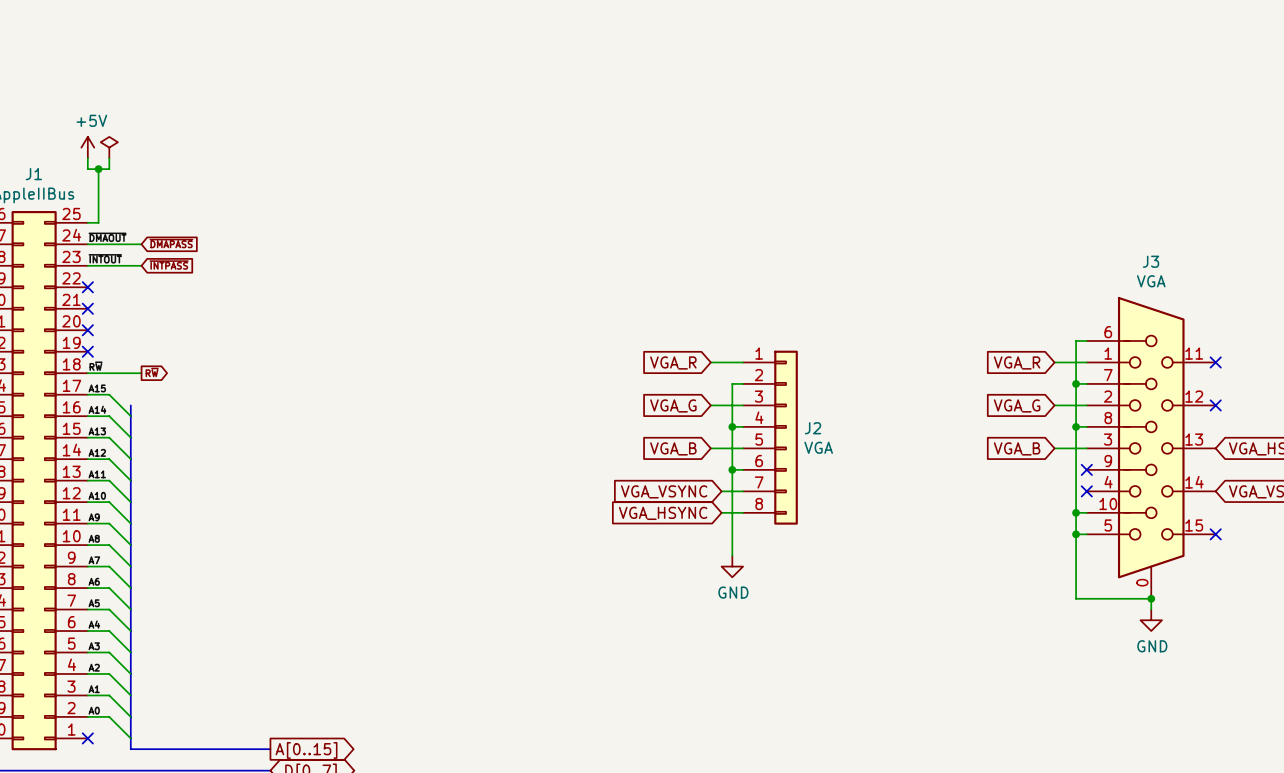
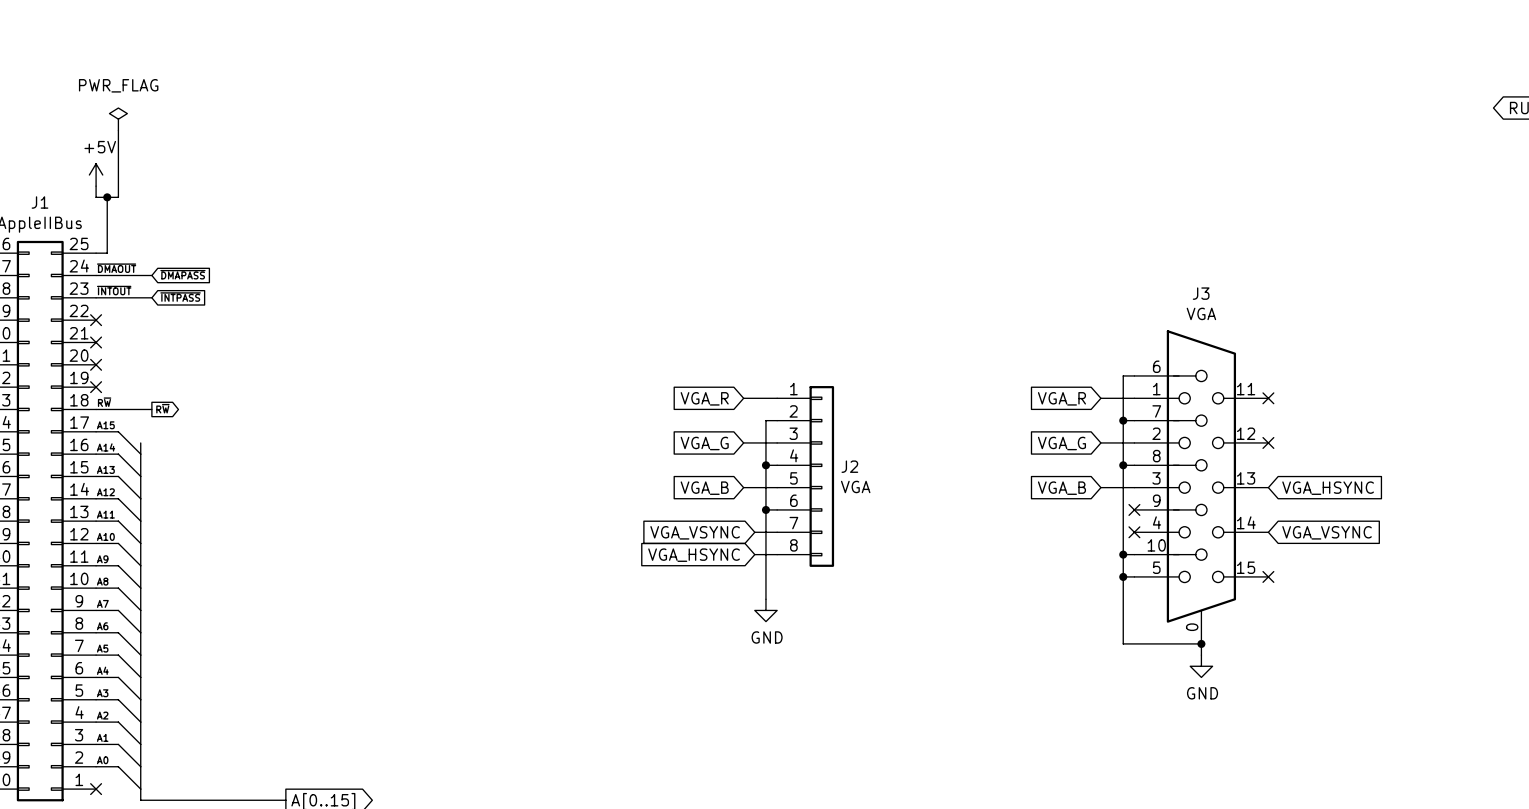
power symbol: none -> PWR_FLAG (118, 119)
wire: none -> (118, 130) (118, 186)
power symbol: (109, 147) -> none

